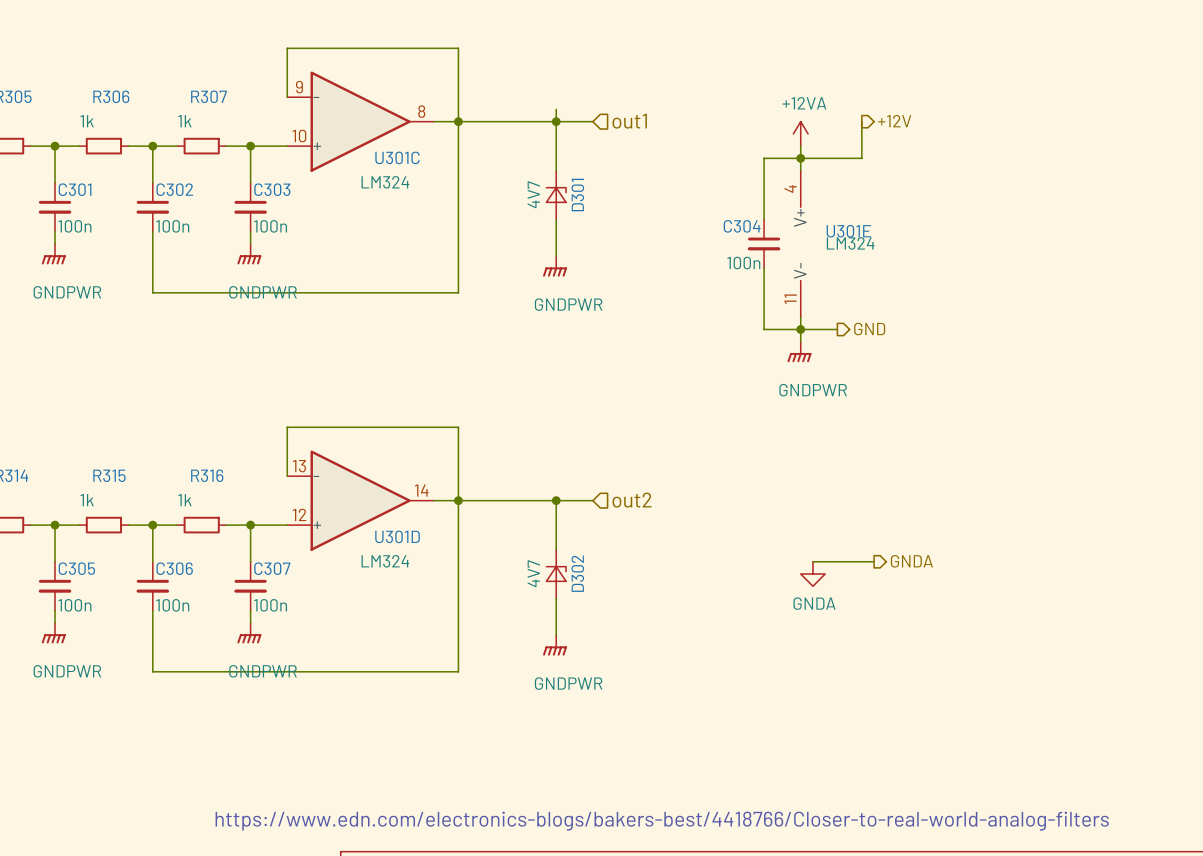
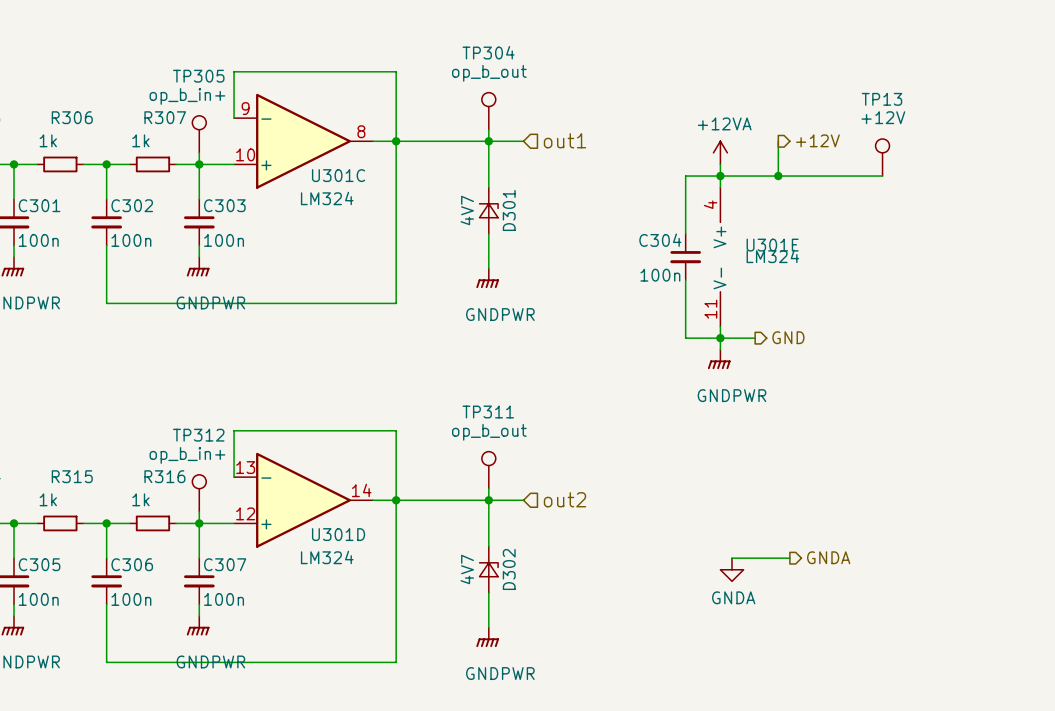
TP304: none -> op_b_out (488, 111)
TP305: none -> op_b_in+ (199, 134)
wire: none -> (199, 152) (199, 164)
TP13: none -> +12V (882, 157)
wire: none -> (778, 176) (882, 176)
junction: none -> (778, 176)
TP311: none -> op_b_out (488, 470)
wire: none -> (488, 488) (488, 500)
TP312: none -> op_b_in+ (199, 493)
wire: none -> (199, 511) (199, 523)

